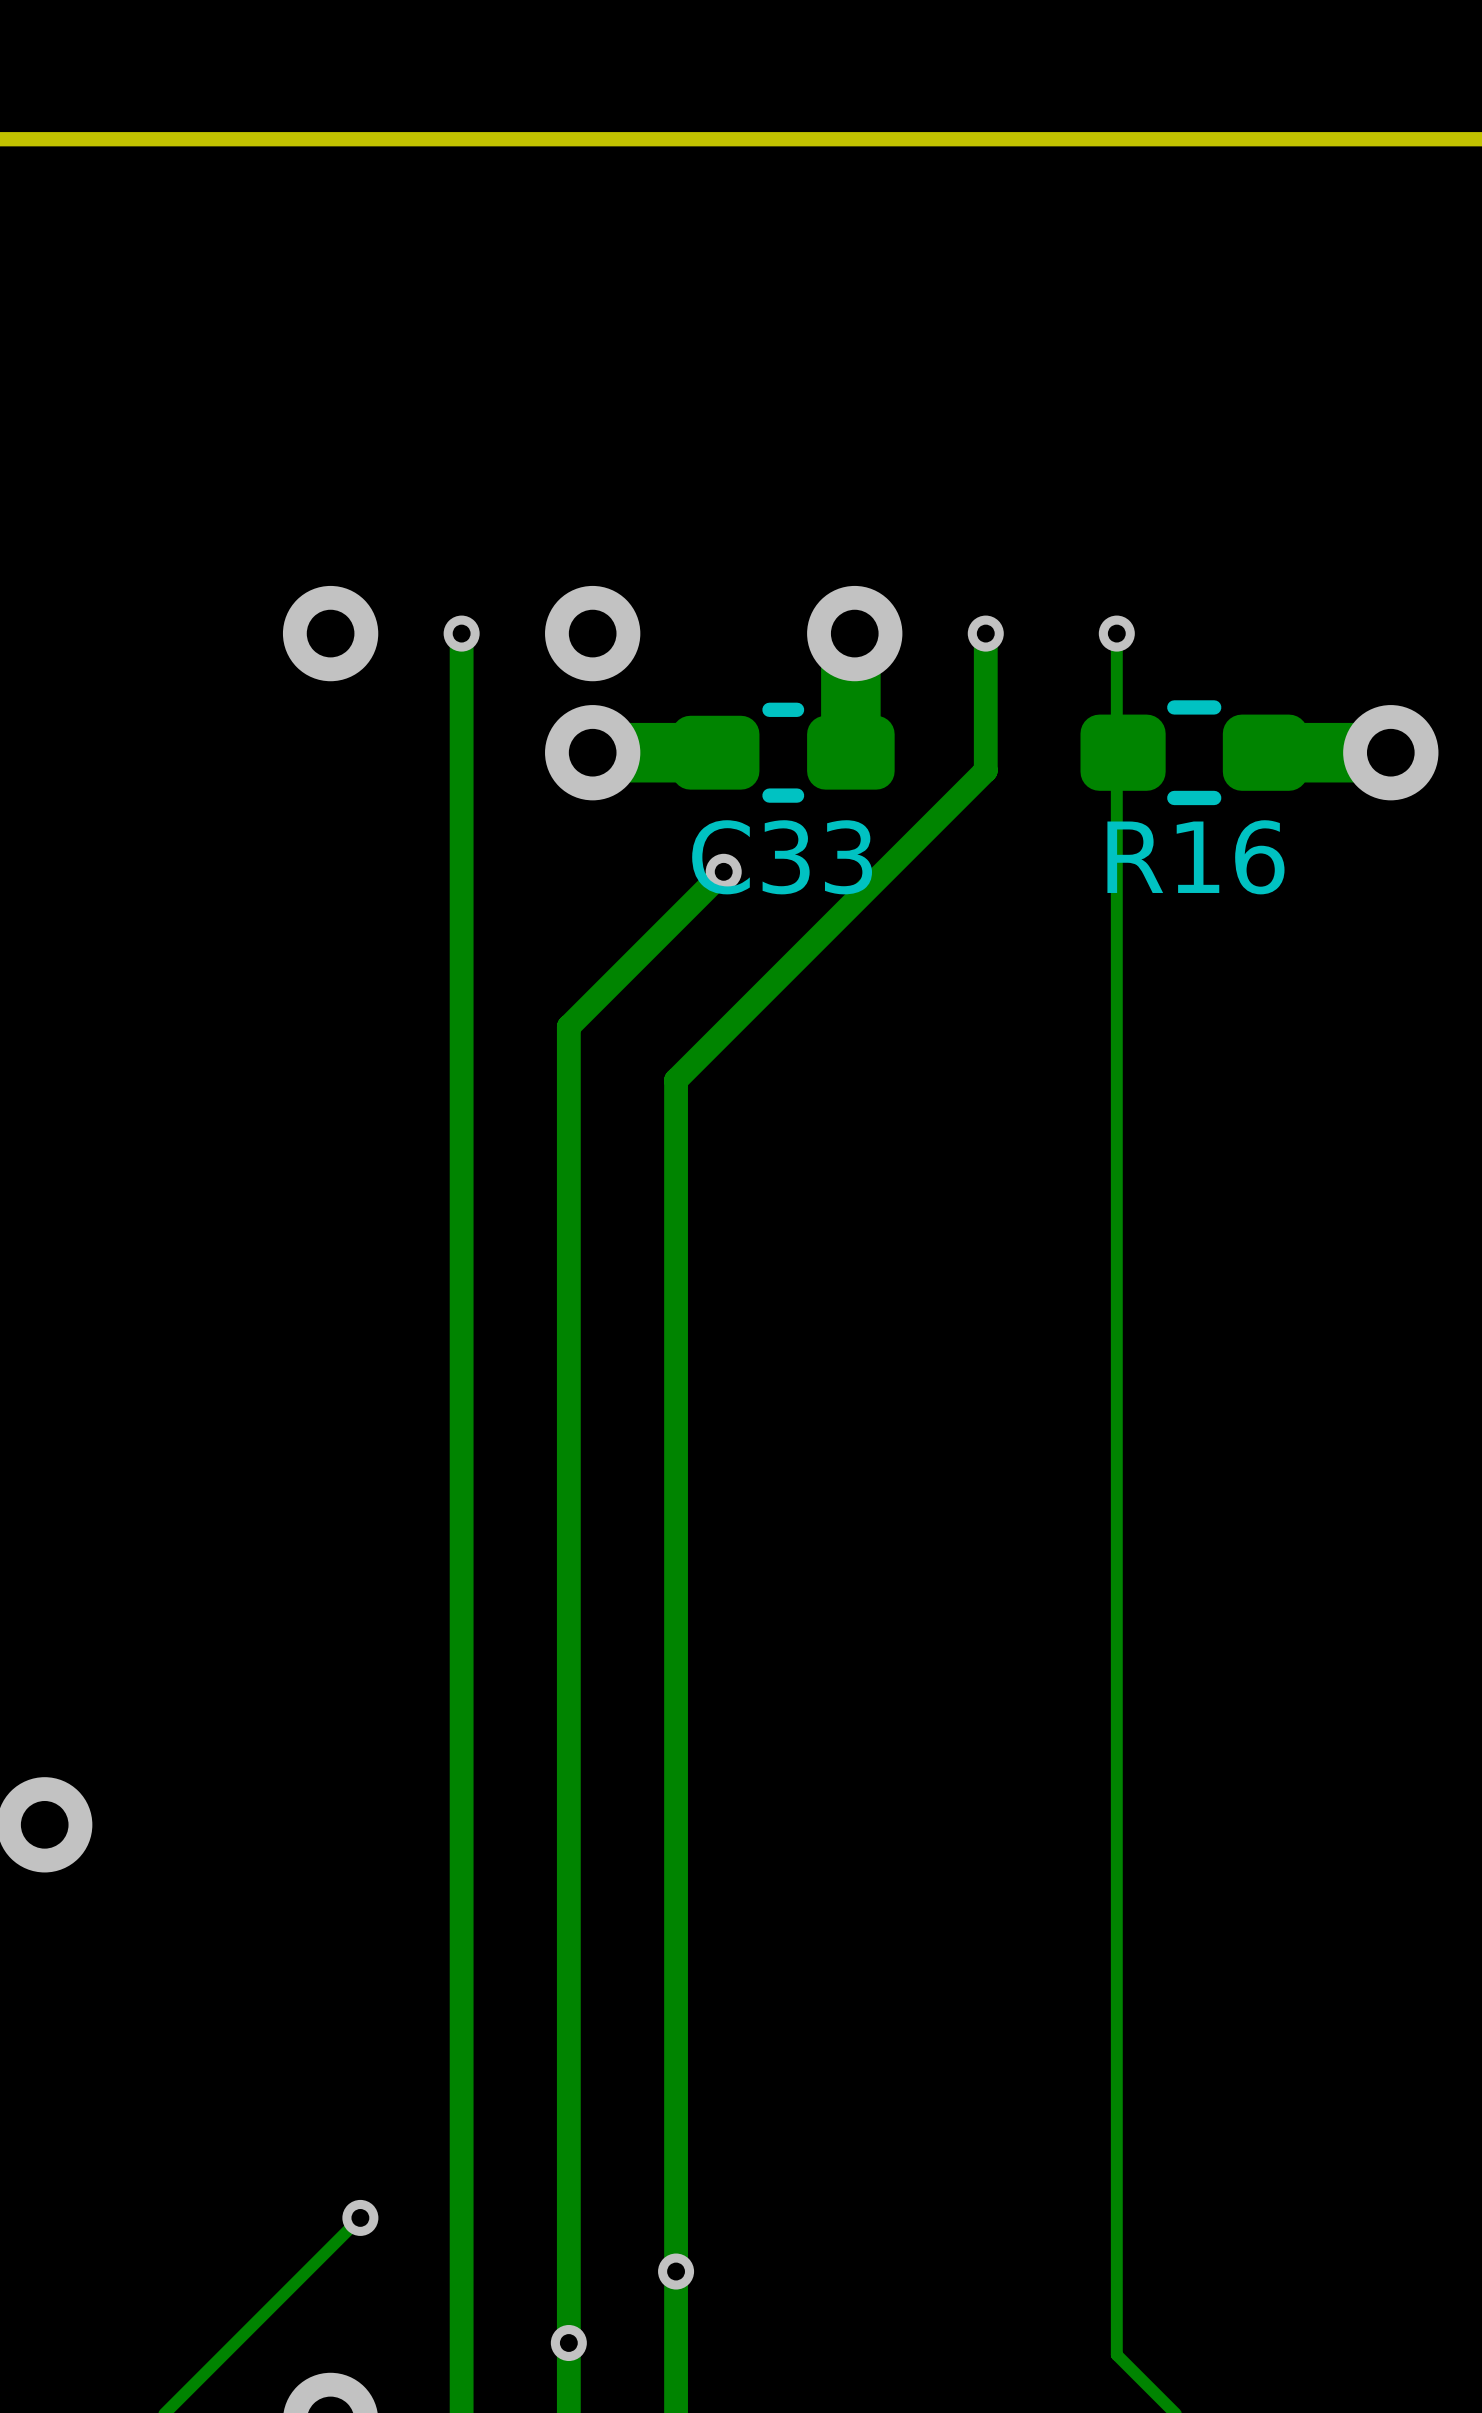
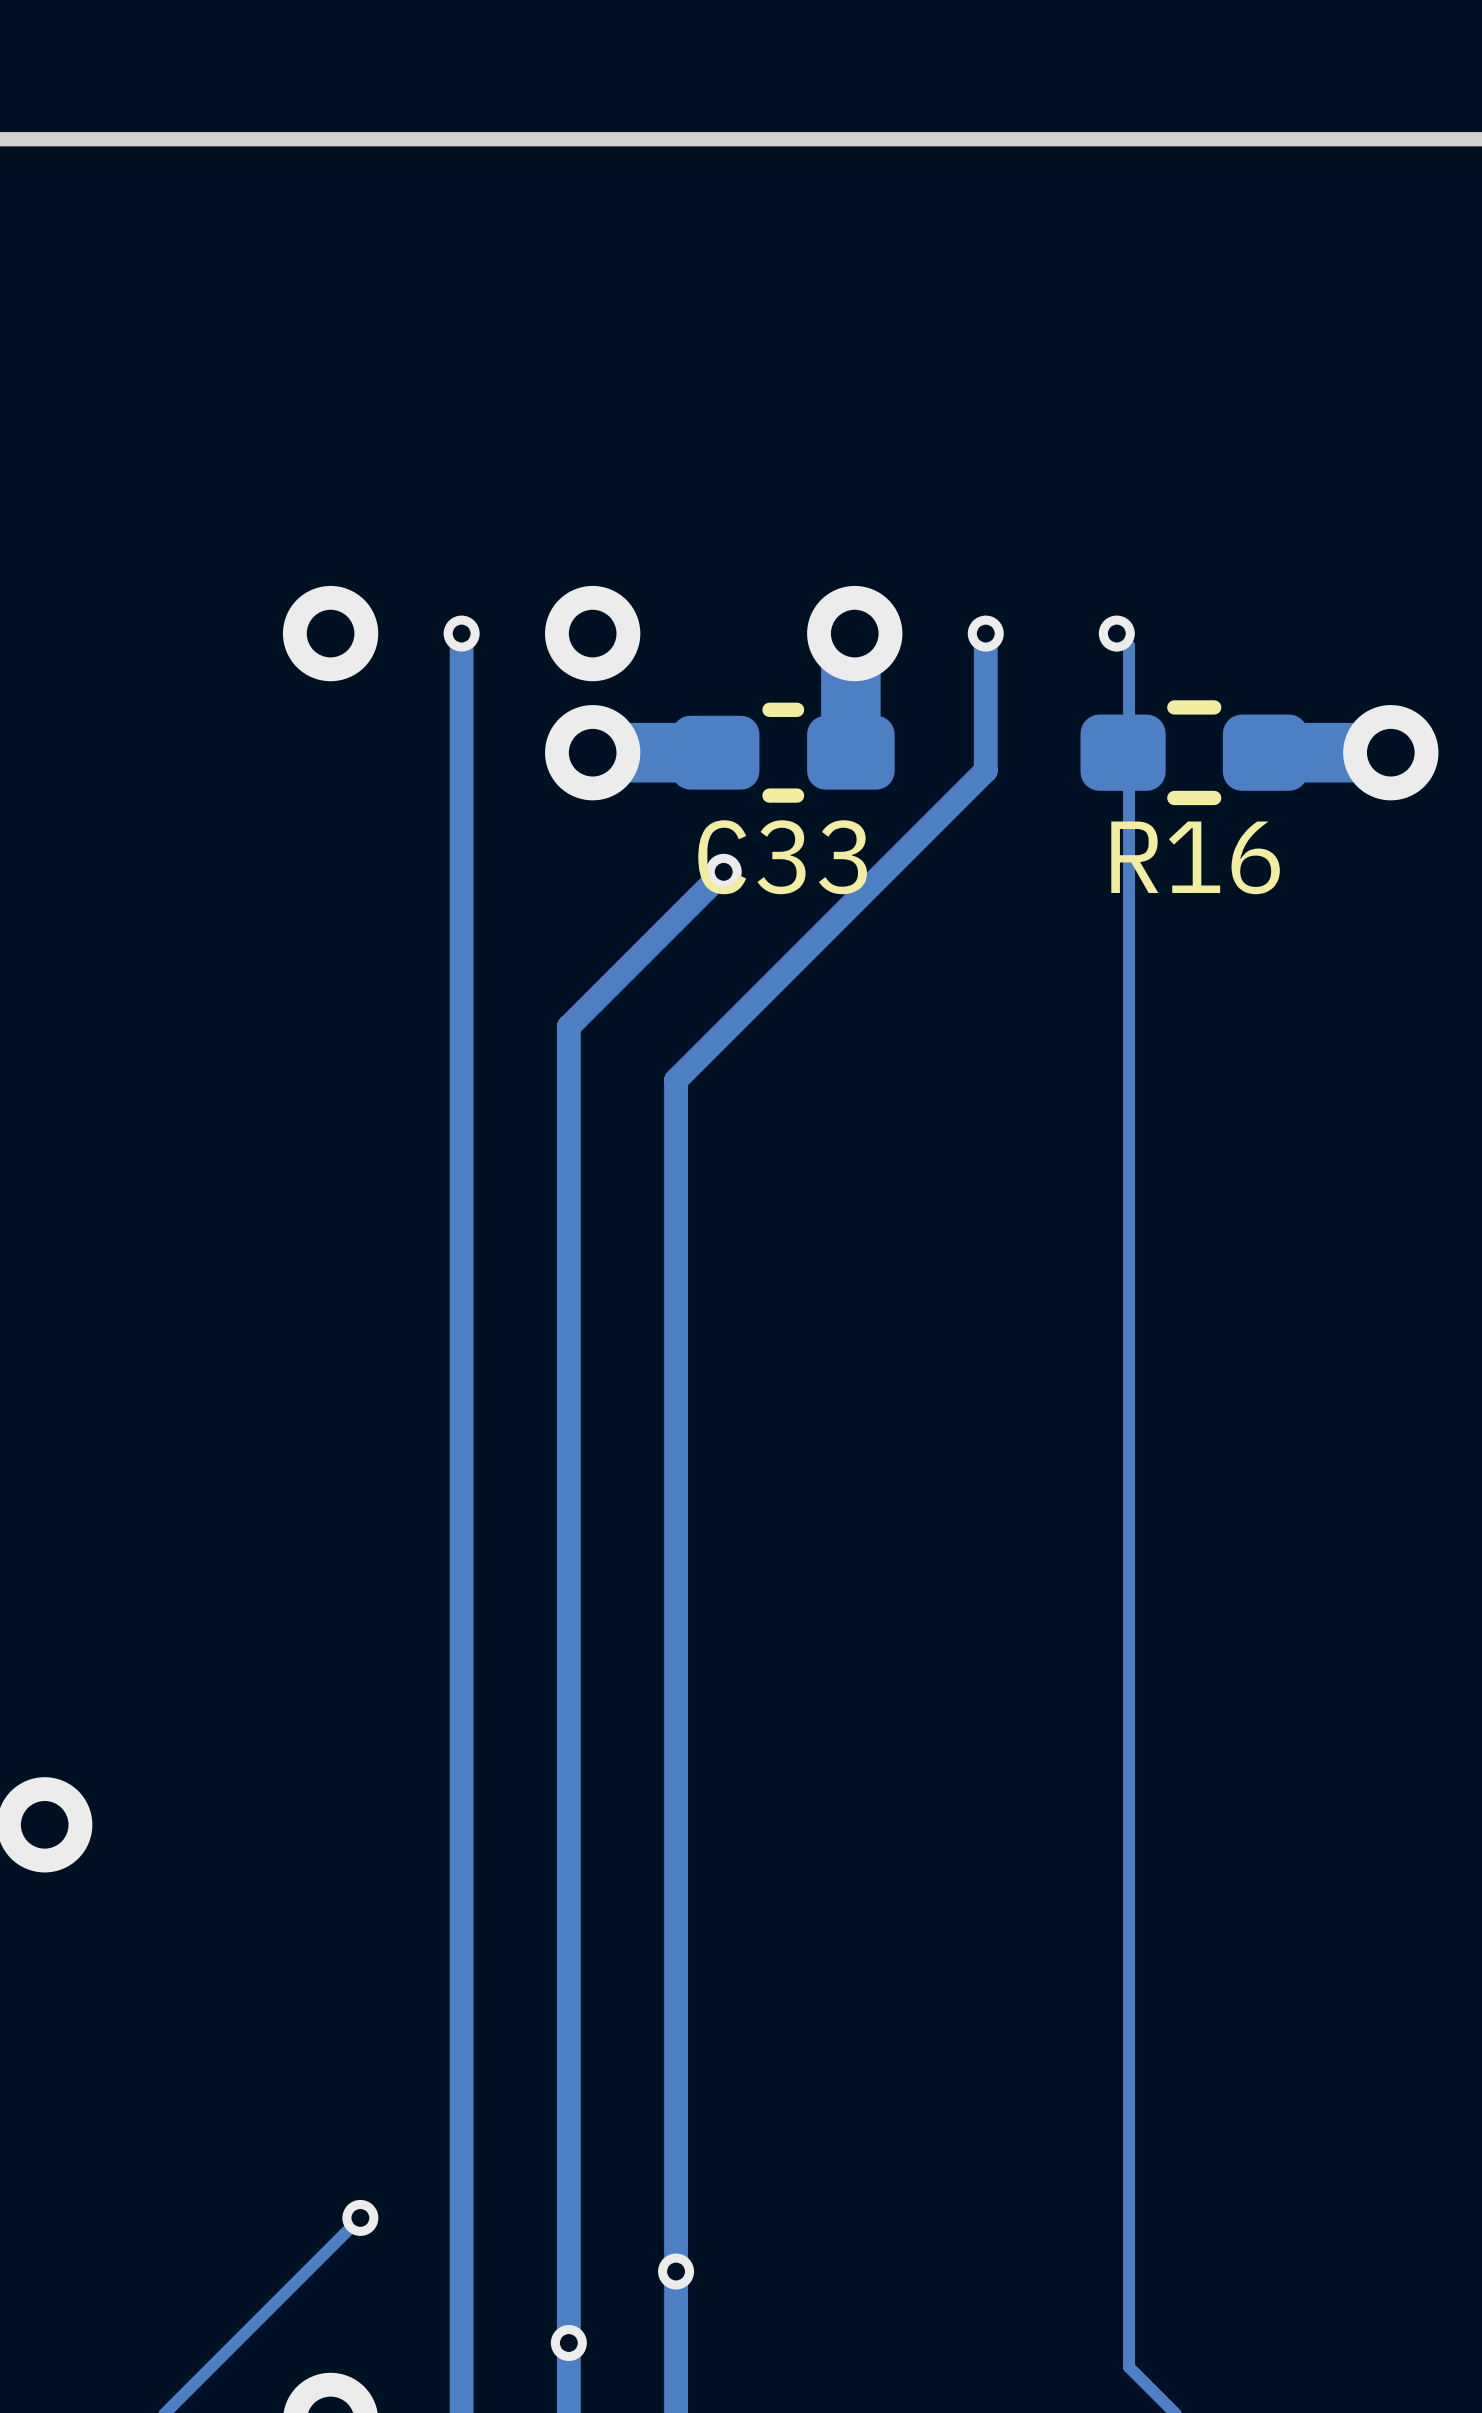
track: (1116, 633) (1116, 2354) (1129, 2367) -> (1116, 633) (1129, 645) (1129, 2367)

